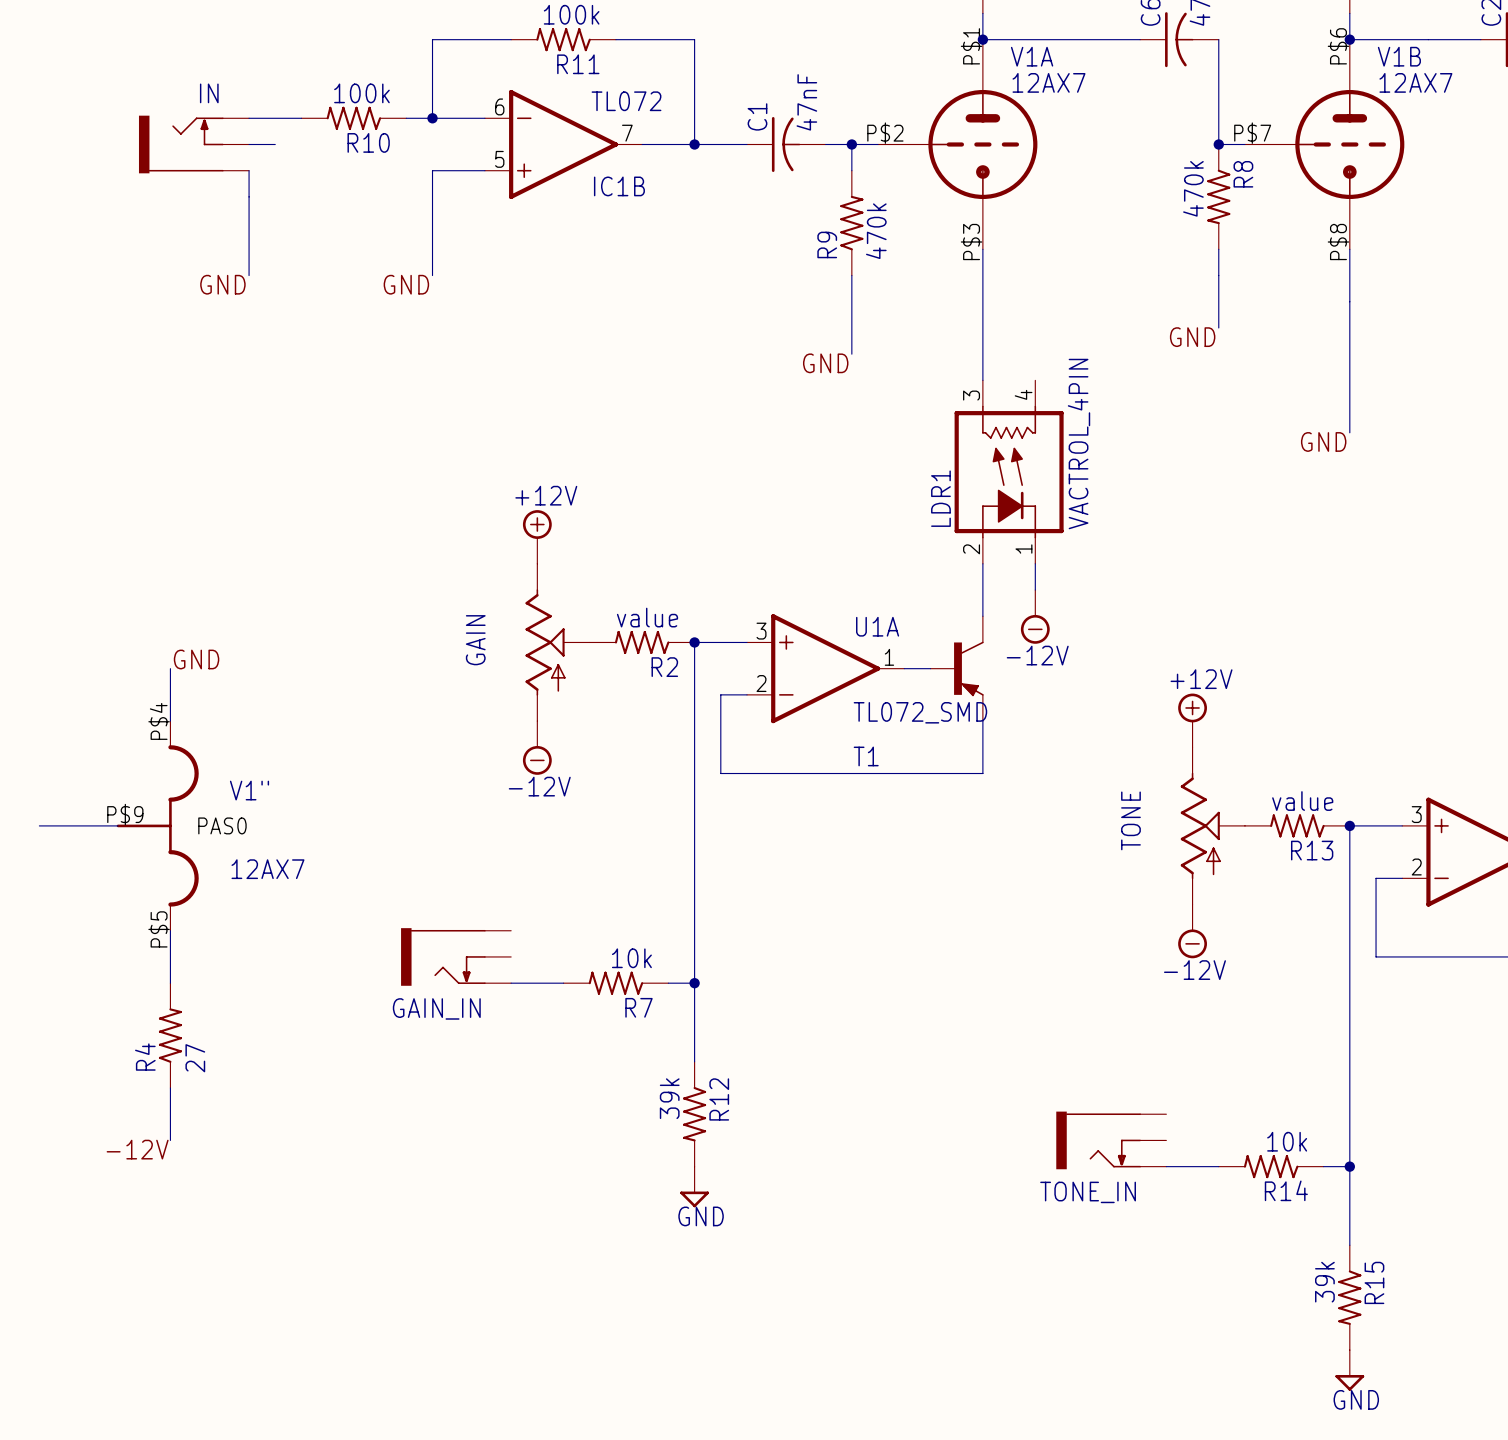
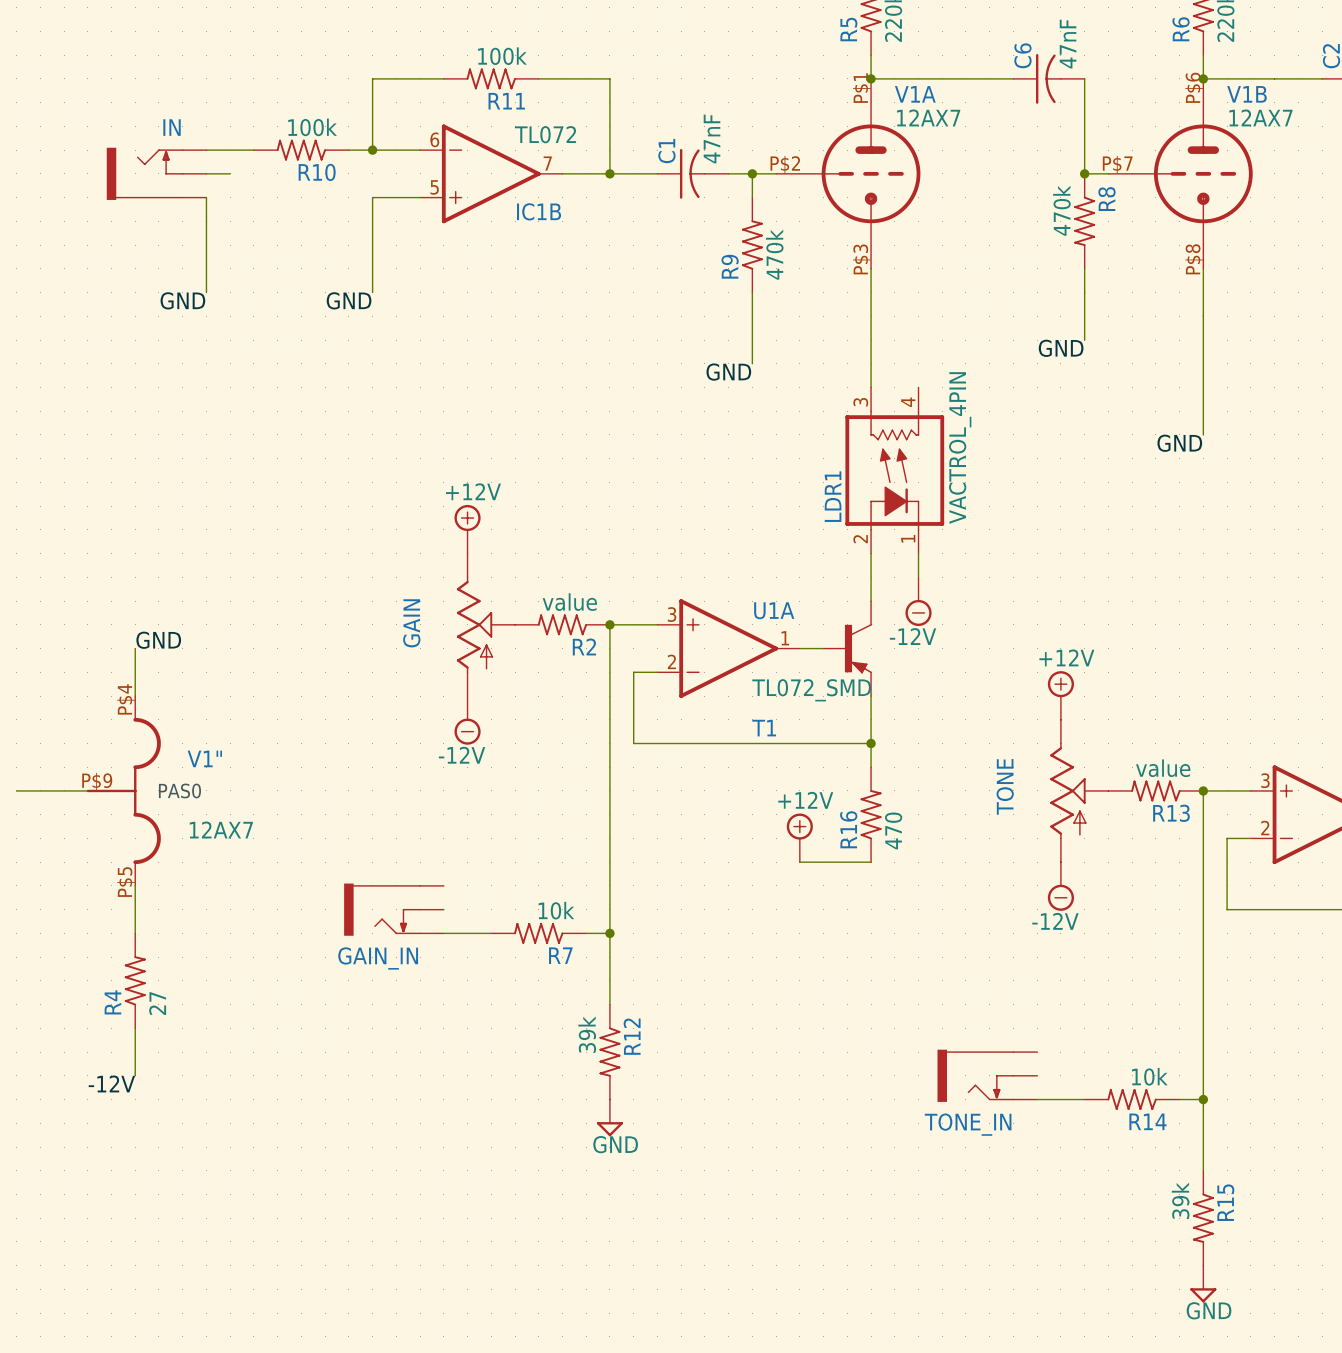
wire: none -> (871, 743) (871, 767)
junction: none -> (871, 743)
R16: none -> 470 (871, 814)
power symbol: none -> +12V (799, 837)
wire: none -> (799, 862) (871, 862)

